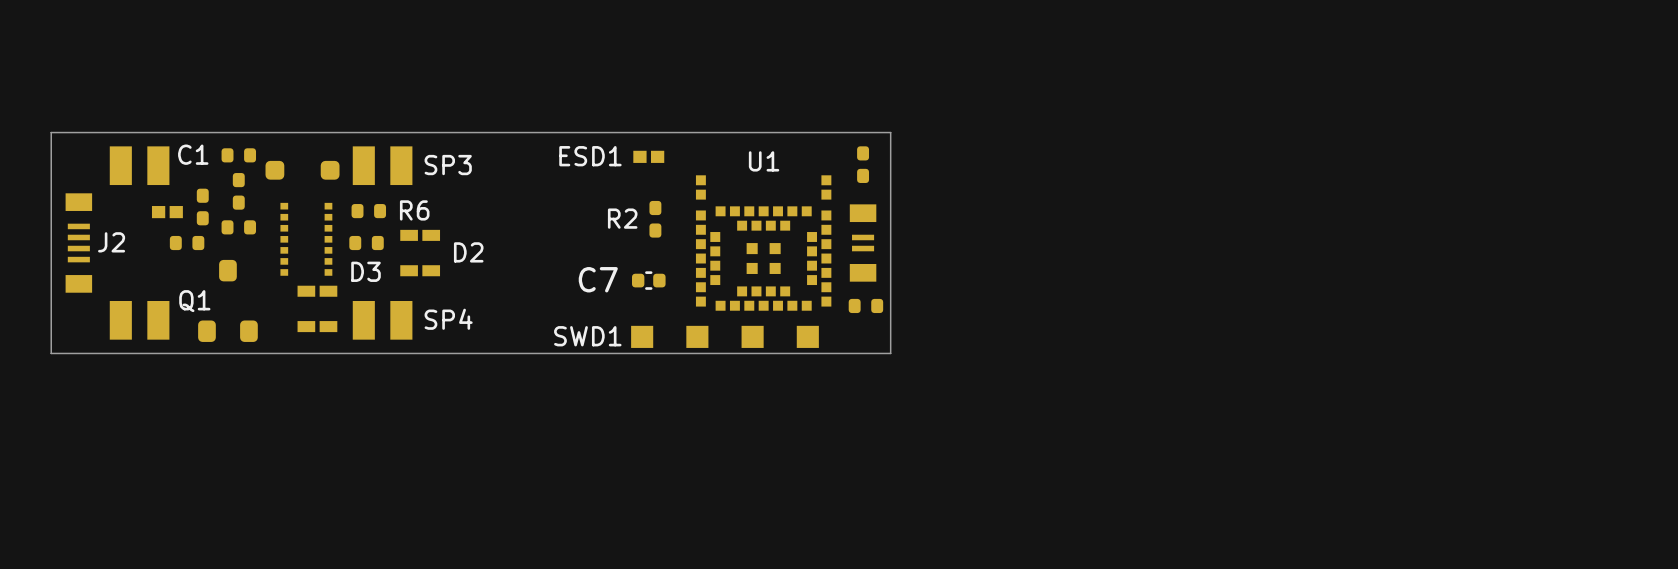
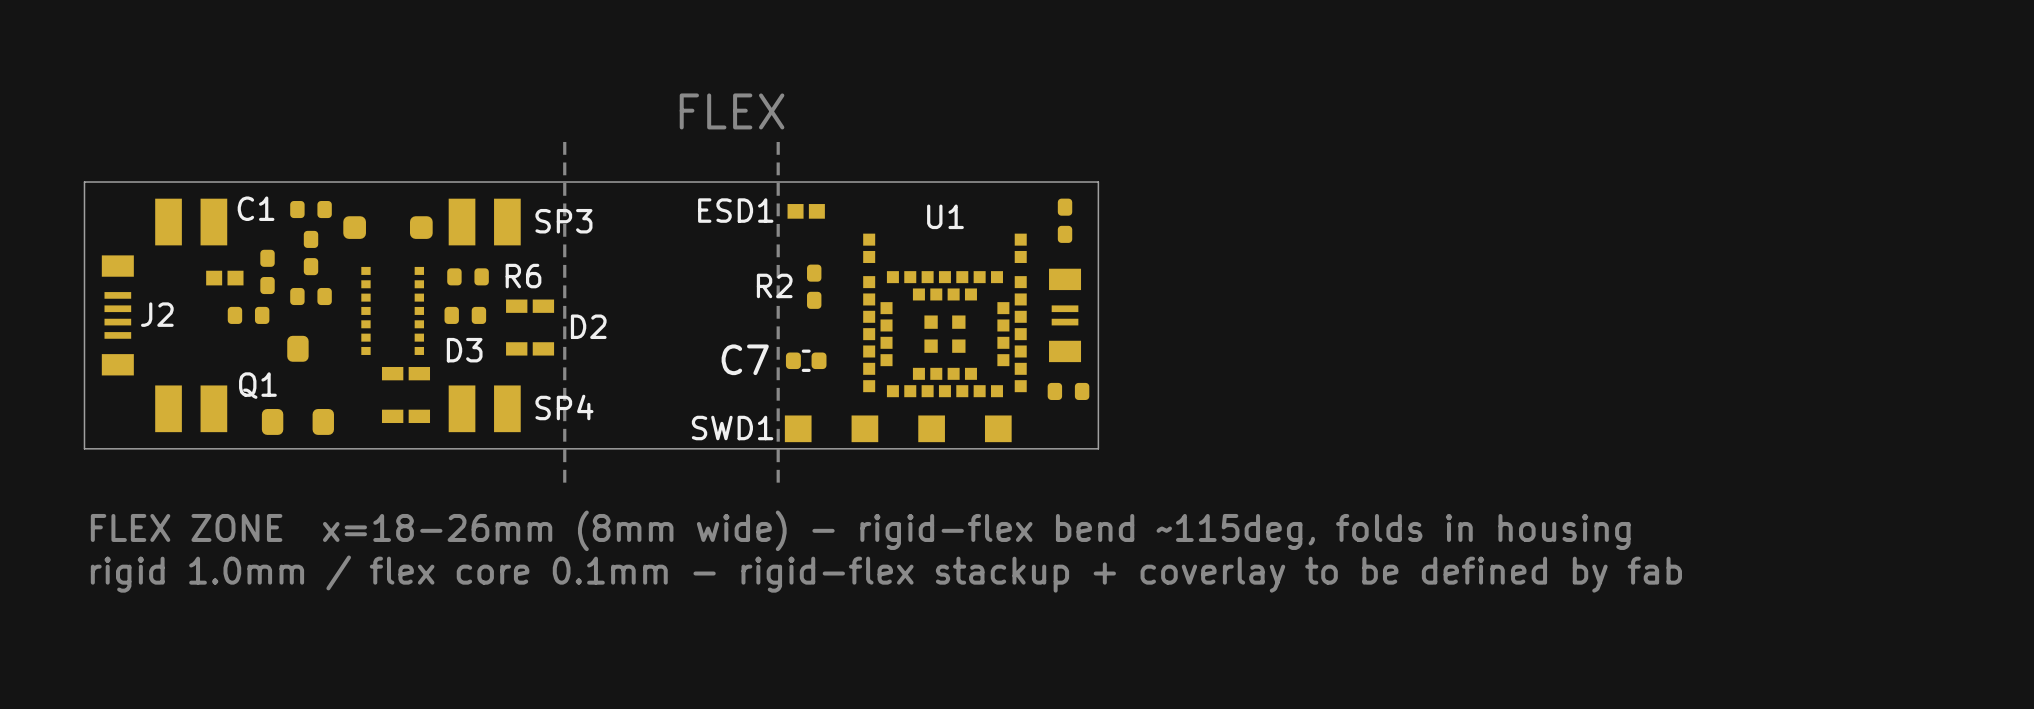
text: none -> FLEX (732, 111)
line: none -> (564, 141) (564, 488)
line: none -> (778, 141) (778, 488)
text: none -> FLEX ZONE x=18-26mm (8mm wide) - rigid-flex bend ~115deg, folds in housing (860, 530)
text: none -> rigid 1.0mm / flex core 0.1mm - rigid-flex stackup + coverlay to be defined by fab (886, 574)

